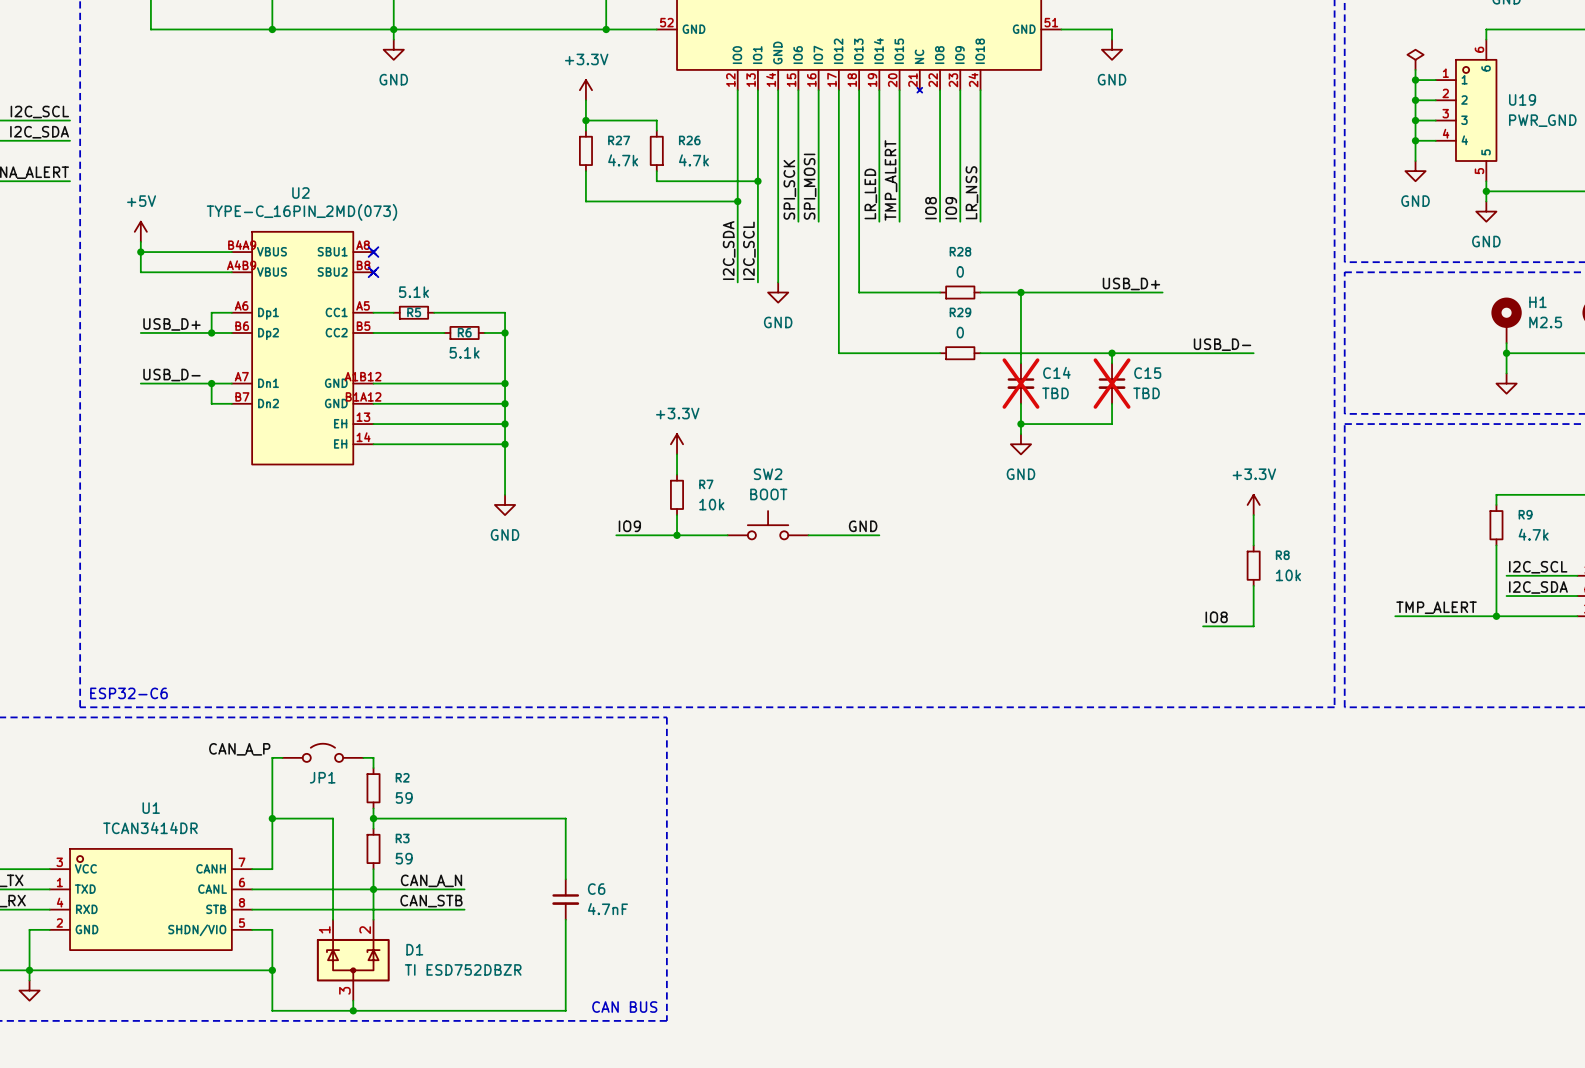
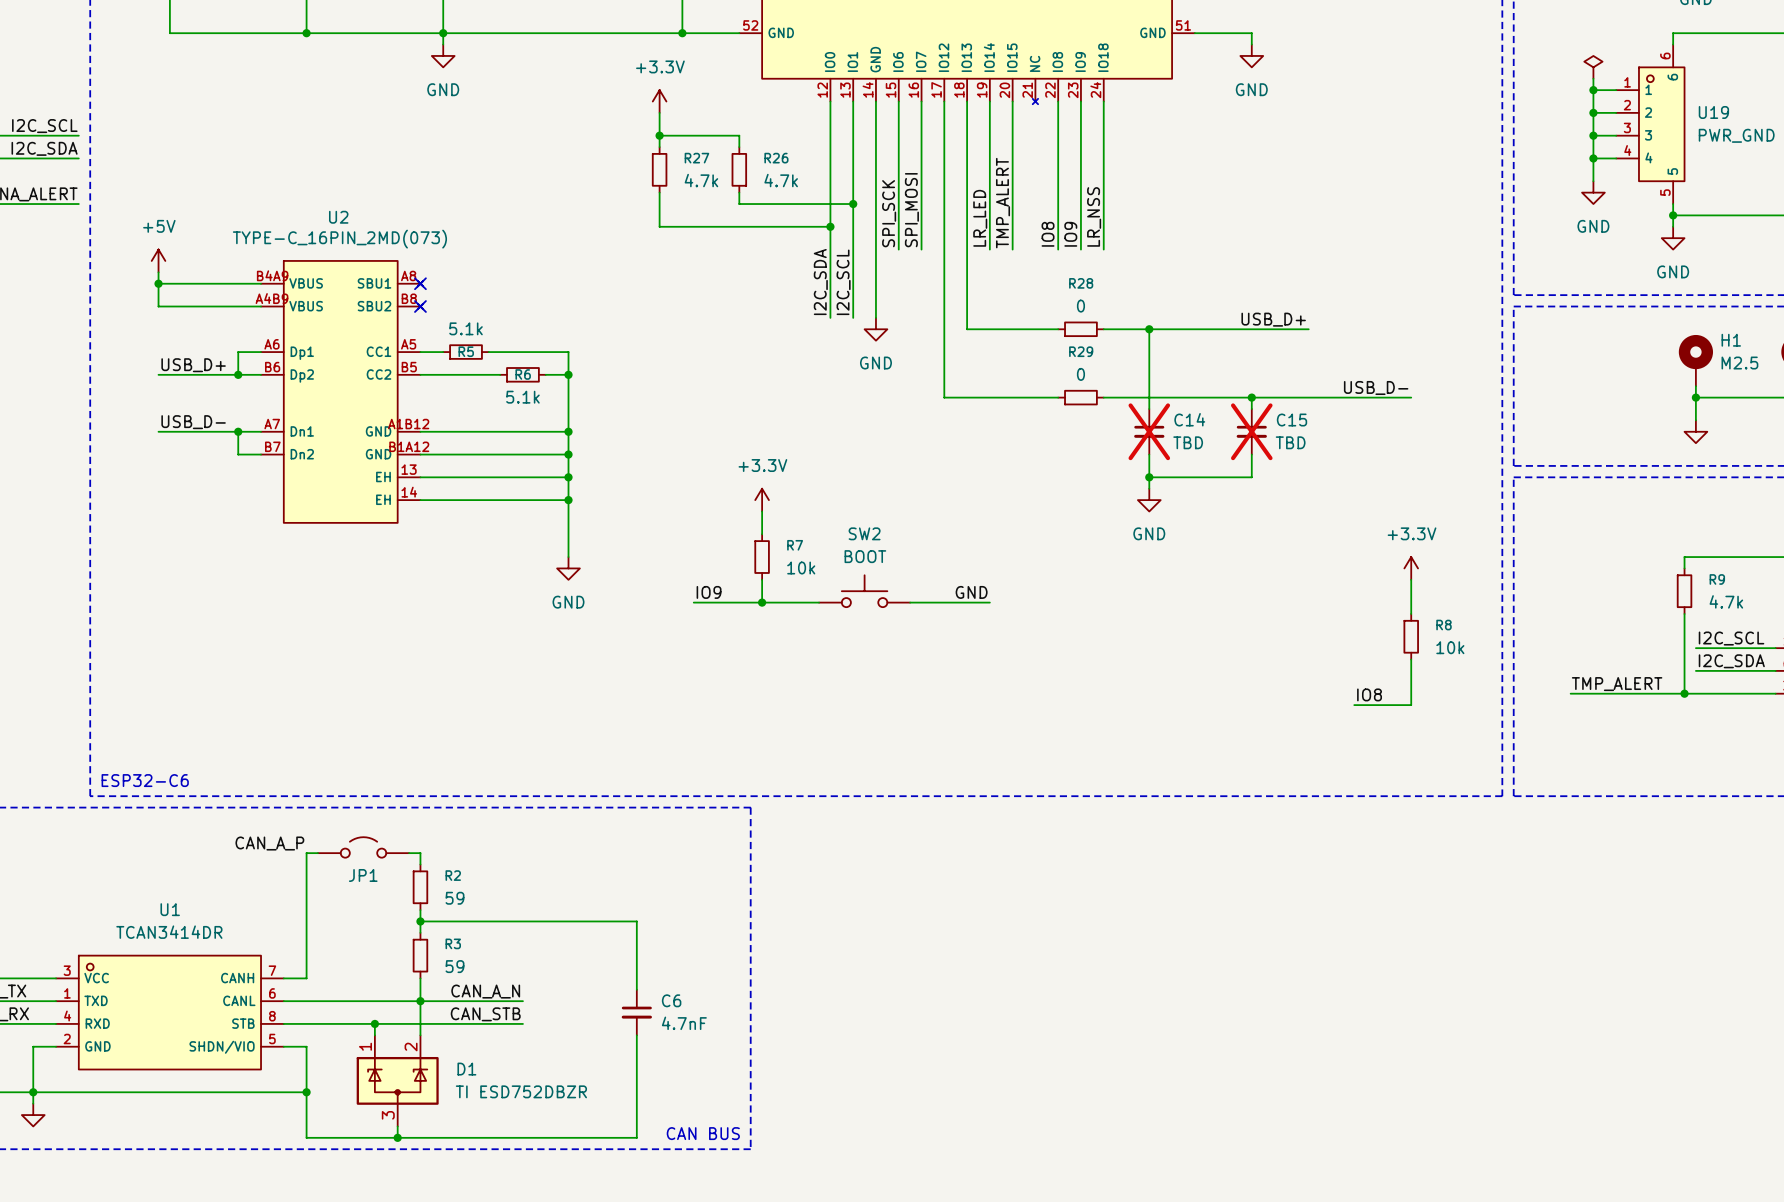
wire: (272, 818) (333, 818) (333, 909) -> none
junction: (272, 818) -> none
junction: none -> (374, 1023)

